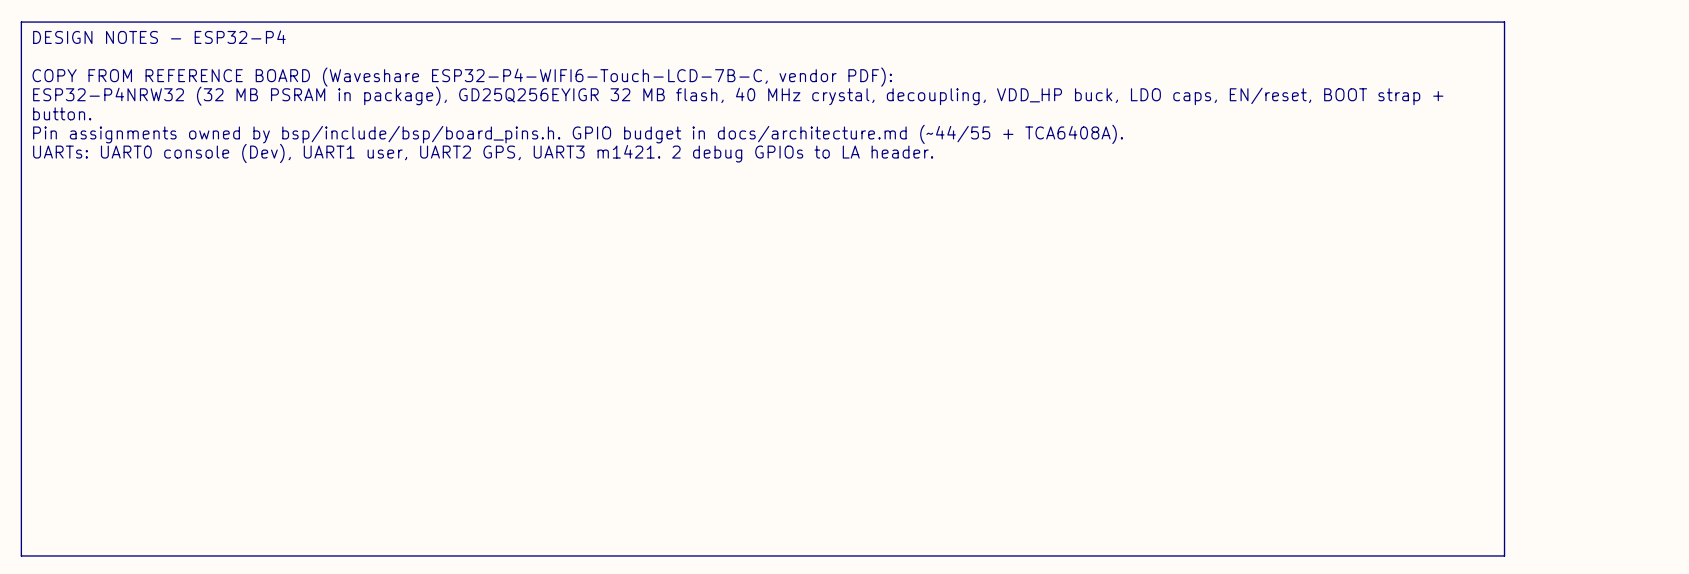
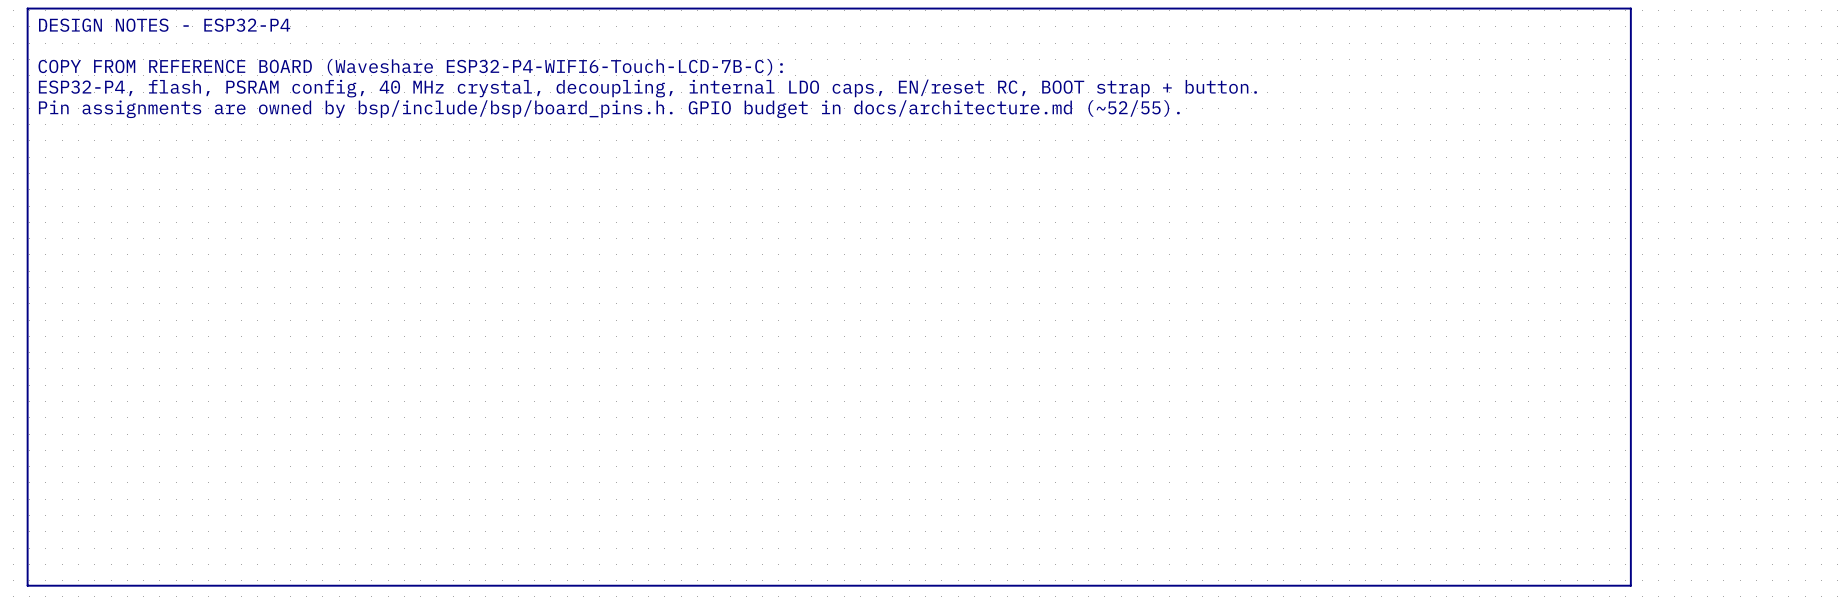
text: COPY FROM REFERENCE BOARD (Waveshare ESP32-P4-WIFI6-Touch-LCD-7B-C, vendor PDF): (462, 77) -> COPY FROM REFERENCE BOARD (Waveshare ESP32-P4-WIFI6-Touch-LCD-7B-C): (410, 67)
text: ESP32-P4NRW32 (32 MB PSRAM in package), GD25Q256EYIGR 32 MB flash, 40 MHz crystal, decoupling, VDD_HP buck, LDO caps, EN/reset, BOOT strap + (738, 96) -> ESP32-P4, flash, PSRAM config, 40 MHz crystal, decoupling, internal LDO caps, EN/reset RC, BOOT strap + button. (647, 88)
text: button. (62, 113) -> Pin assignments are owned by bsp/include/bsp/board_pins.h. GPIO budget in docs/architecture.md (~52/55). (609, 109)
text: Pin assignments owned by bsp/include/bsp/board_pins.h. GPIO budget in docs/architecture.md (~44/55 + TCA6408A). (578, 134) -> none
text: UARTs: UART0 console (Dev), UART1 user, UART2 GPS, UART3 m1421. 2 debug GPIOs to LA header. (483, 153) -> none

